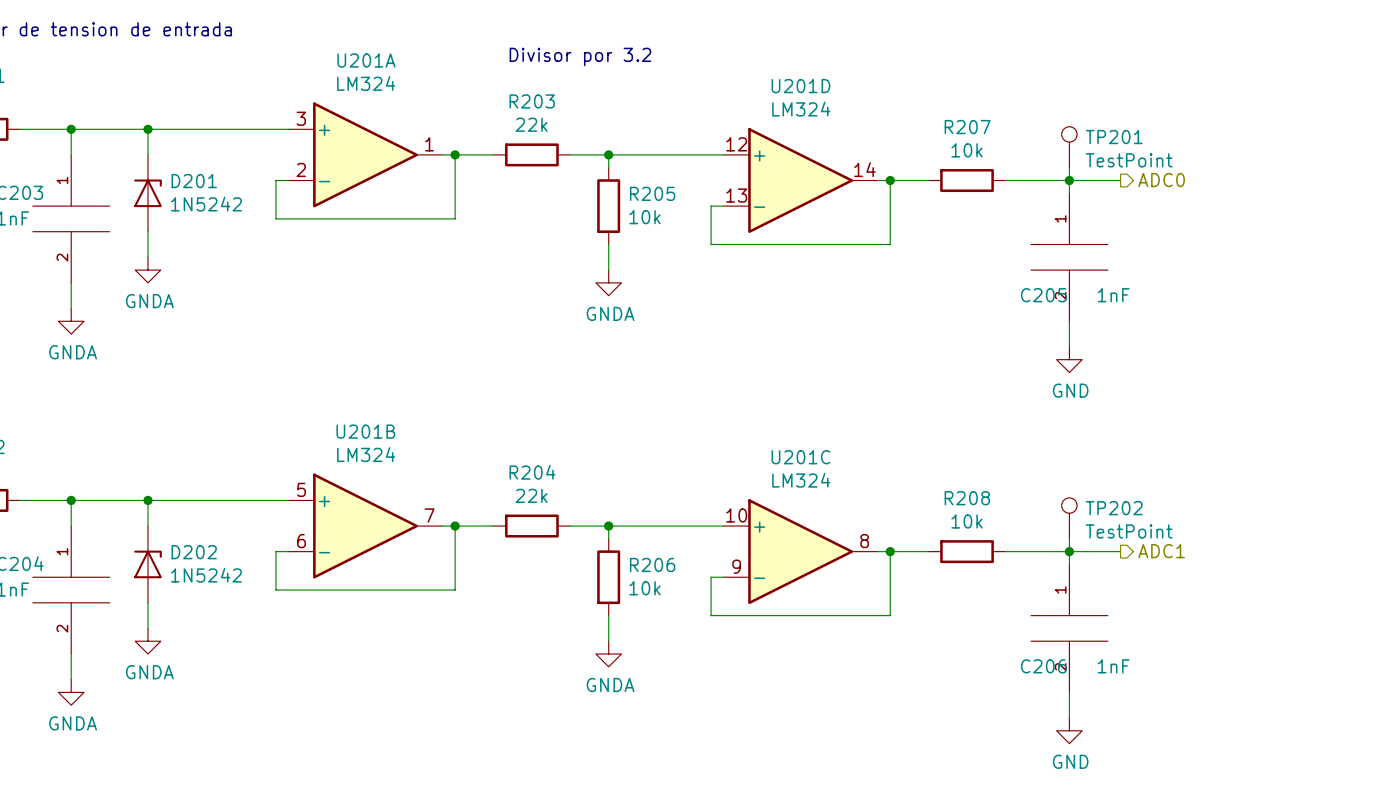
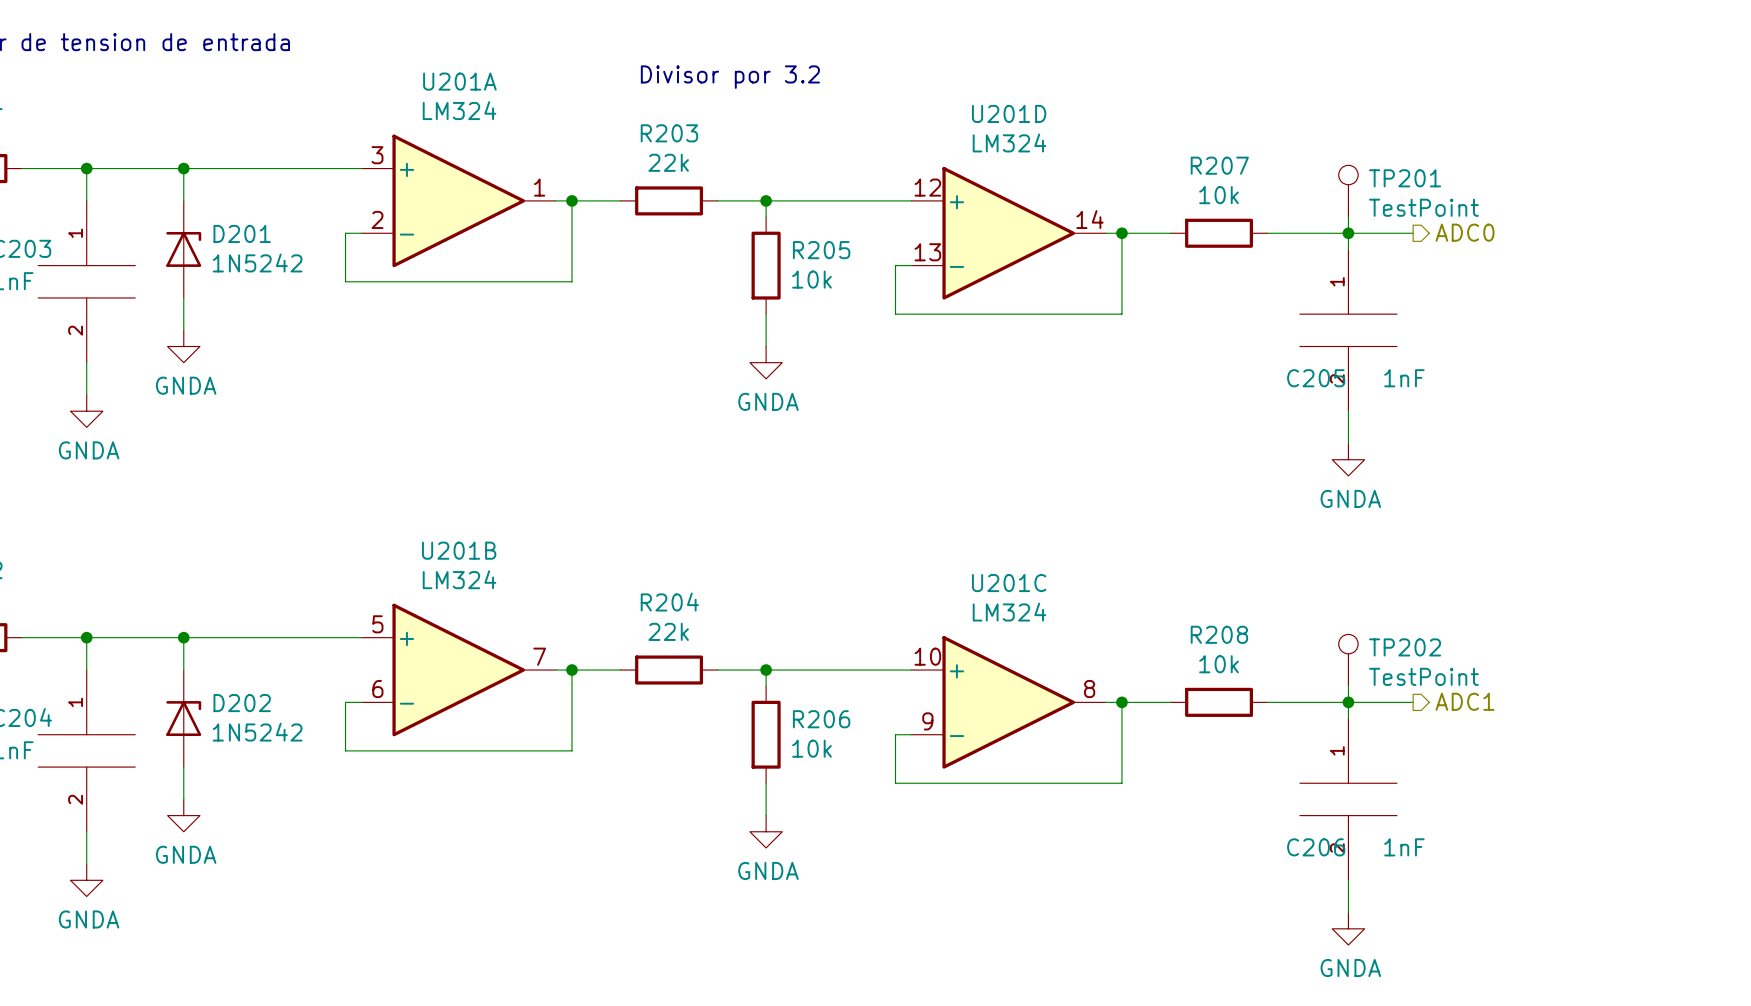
power symbol: GND (1069, 359) -> GNDA (1348, 459)
power symbol: GND (1069, 730) -> GNDA (1348, 928)

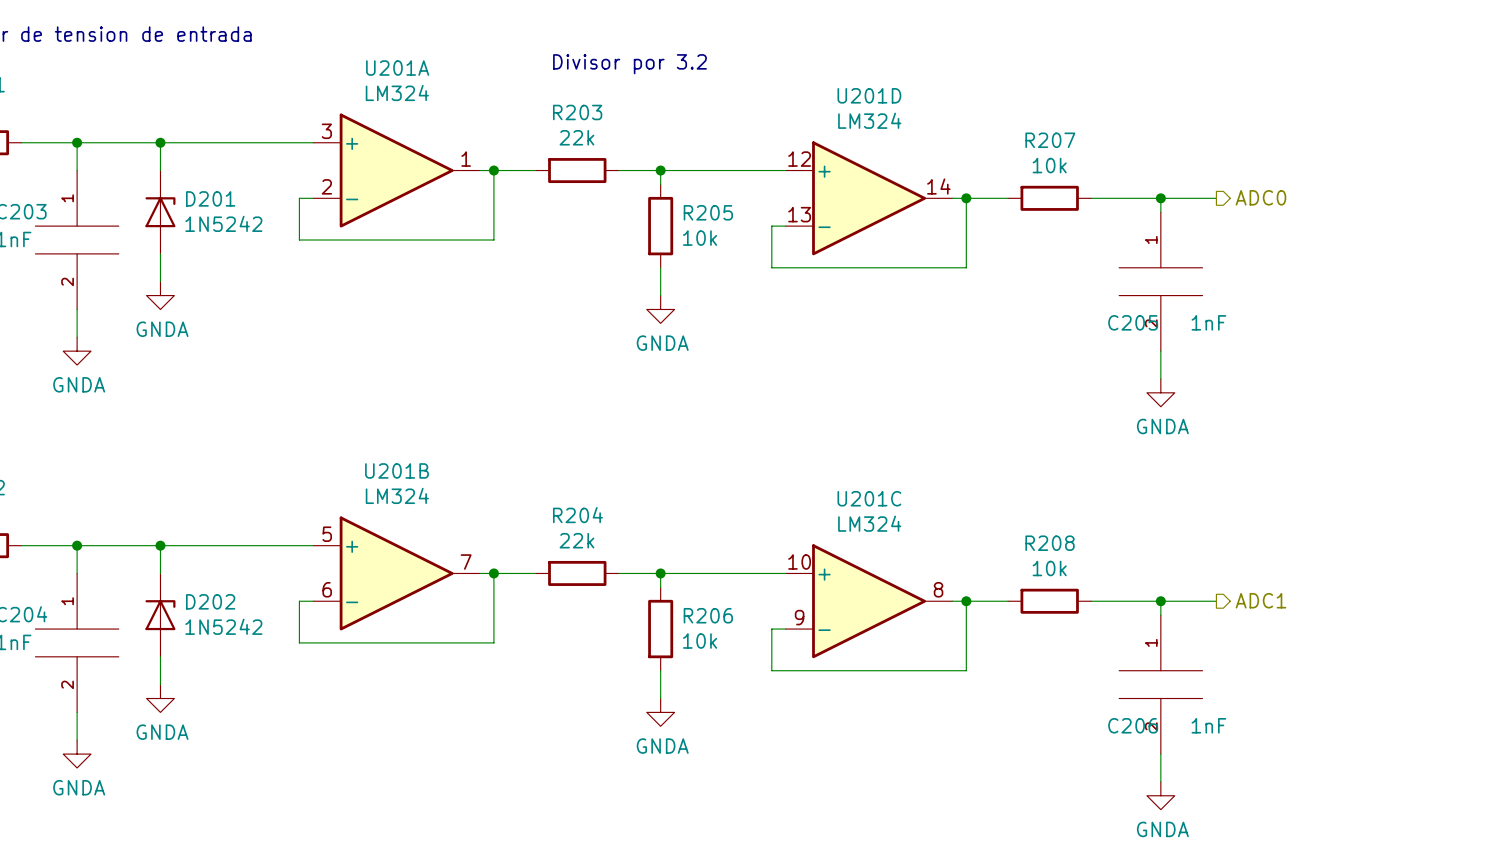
TP201: TestPoint (1348, 191) -> none
wire: (1348, 217) (1348, 233) -> none
TP202: TestPoint (1348, 660) -> none
wire: (1348, 686) (1348, 702) -> none

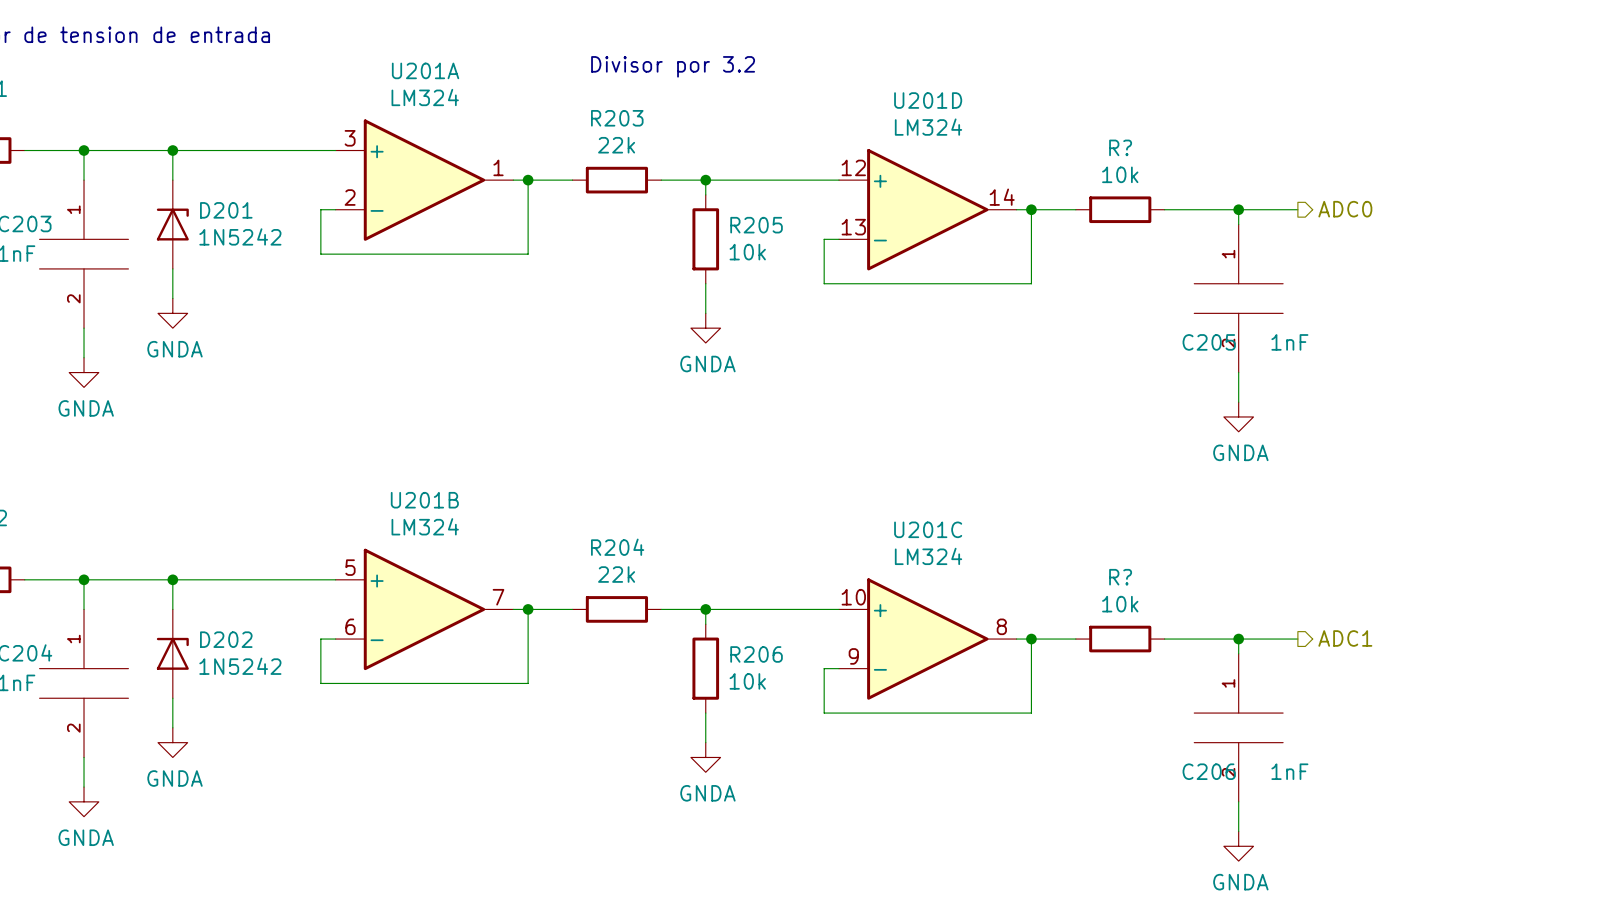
R207 name: R207 (1050, 140) -> R? (1120, 147)
R208 name: R208 (1050, 543) -> R? (1120, 577)

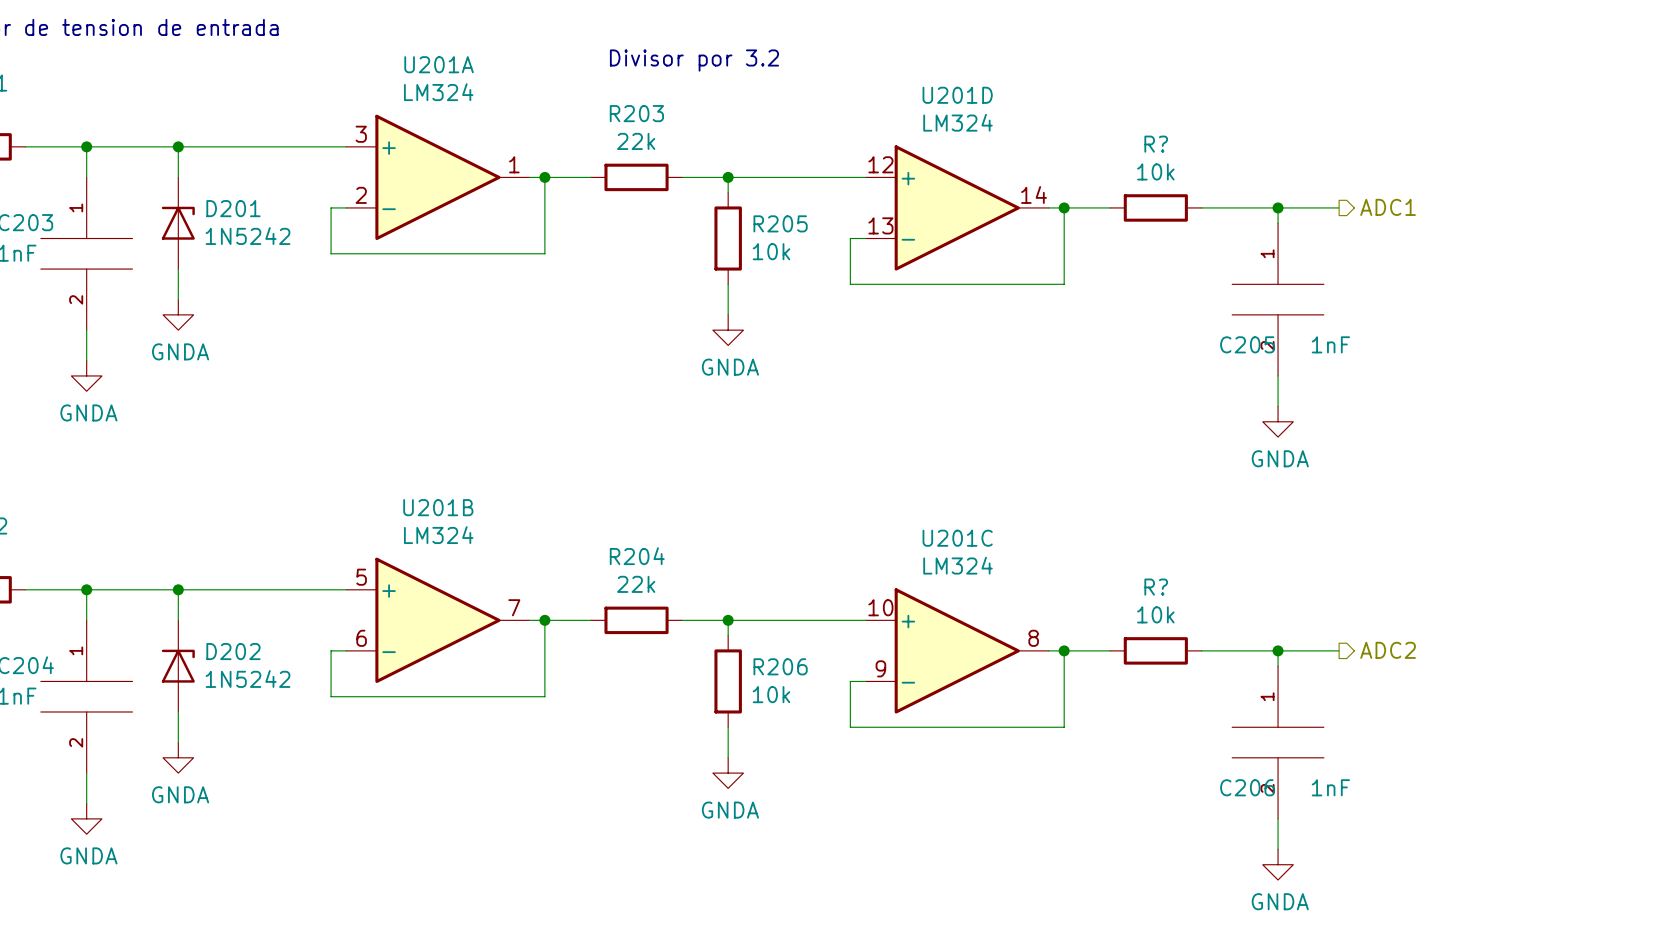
hierarchical label: ADC0 (1345, 209) -> ADC1 (1388, 207)
hierarchical label: ADC1 (1345, 638) -> ADC2 (1388, 650)

